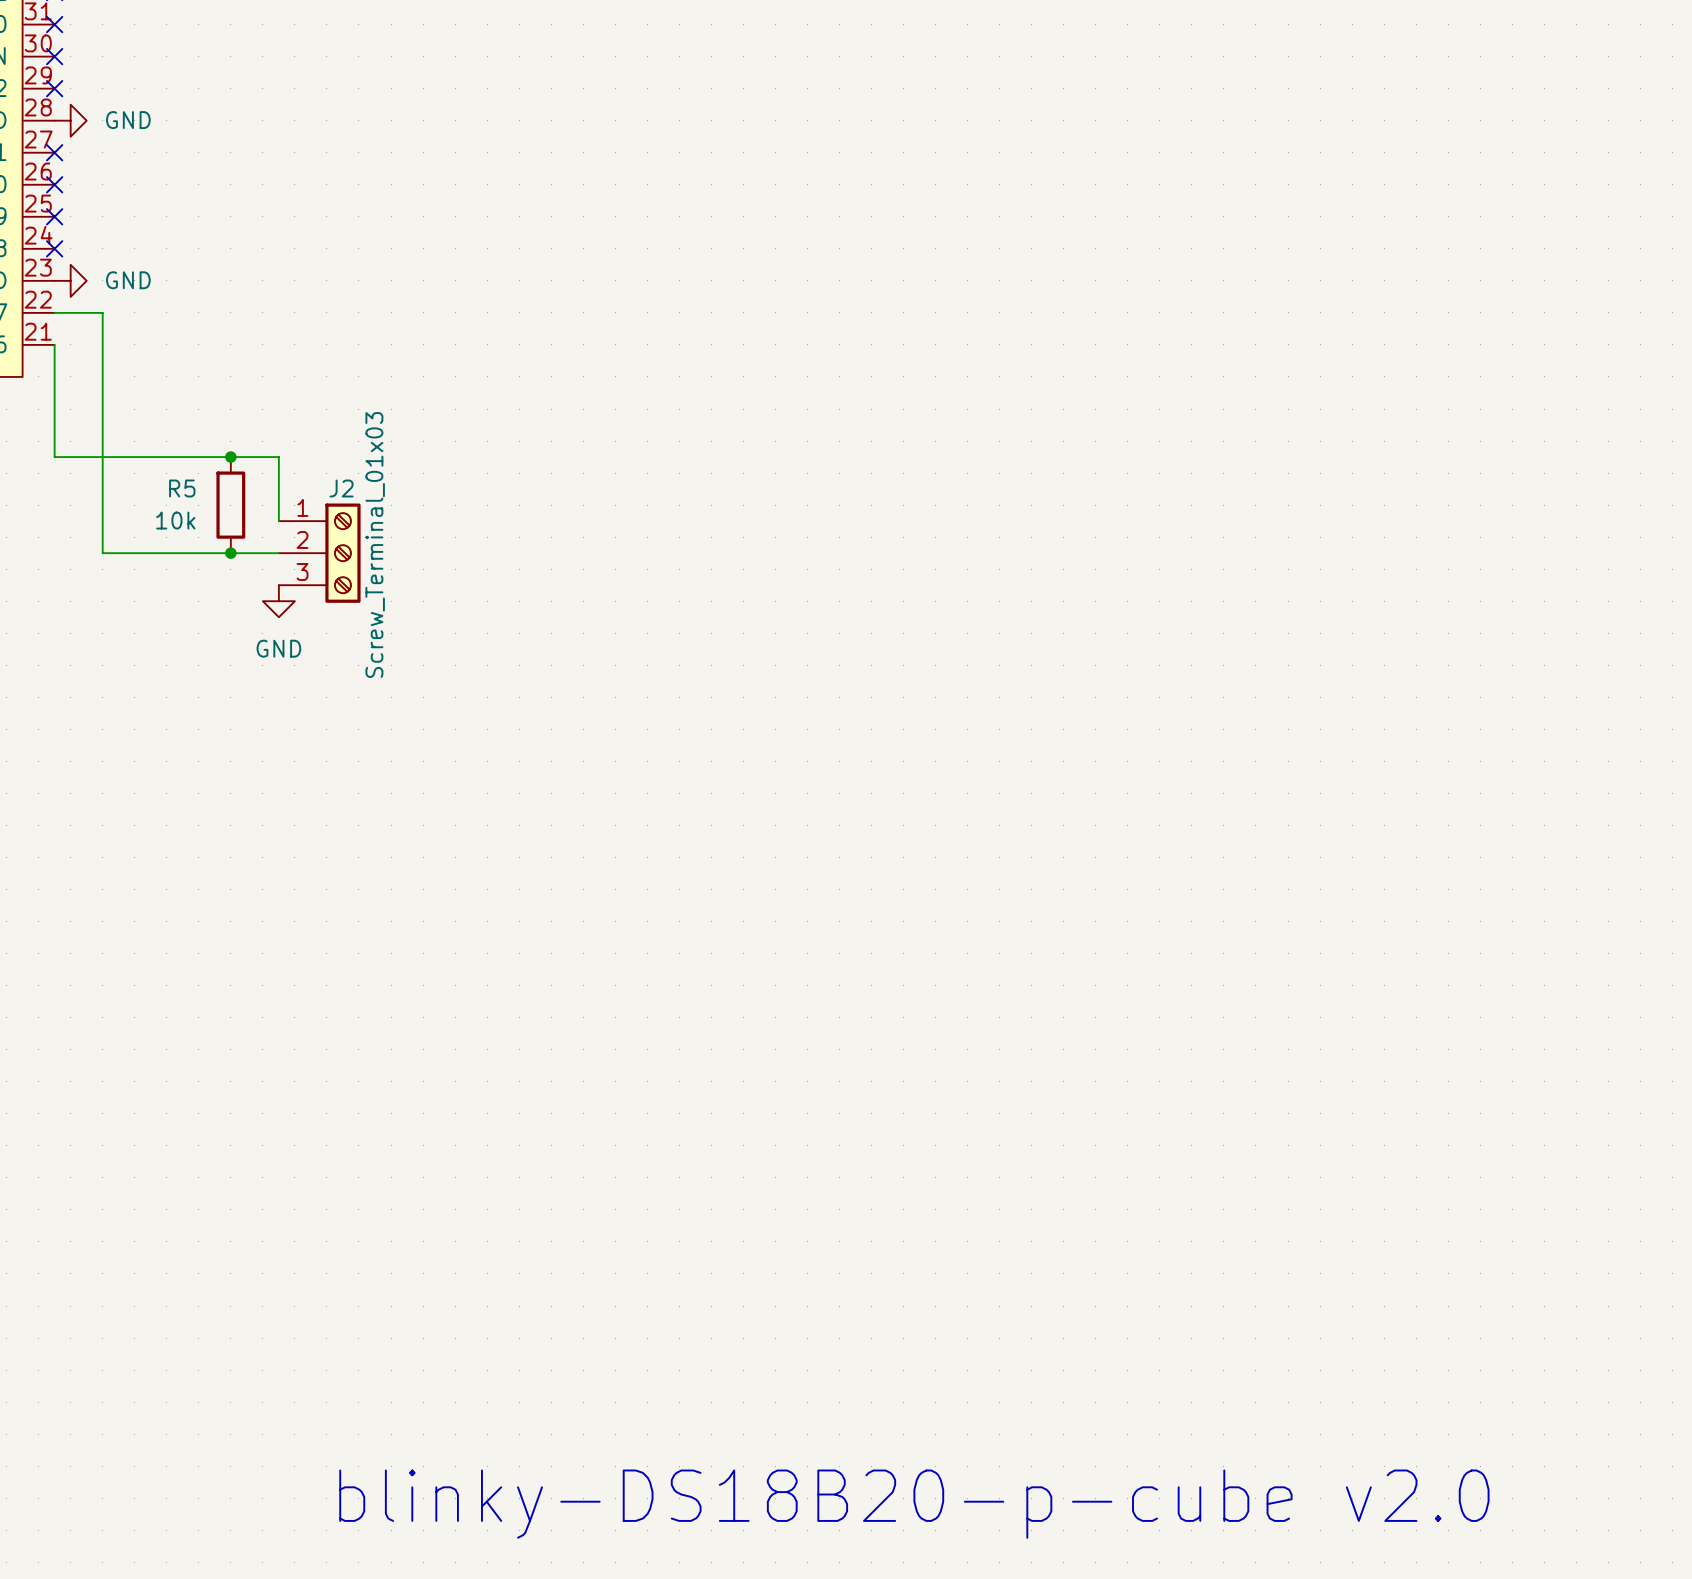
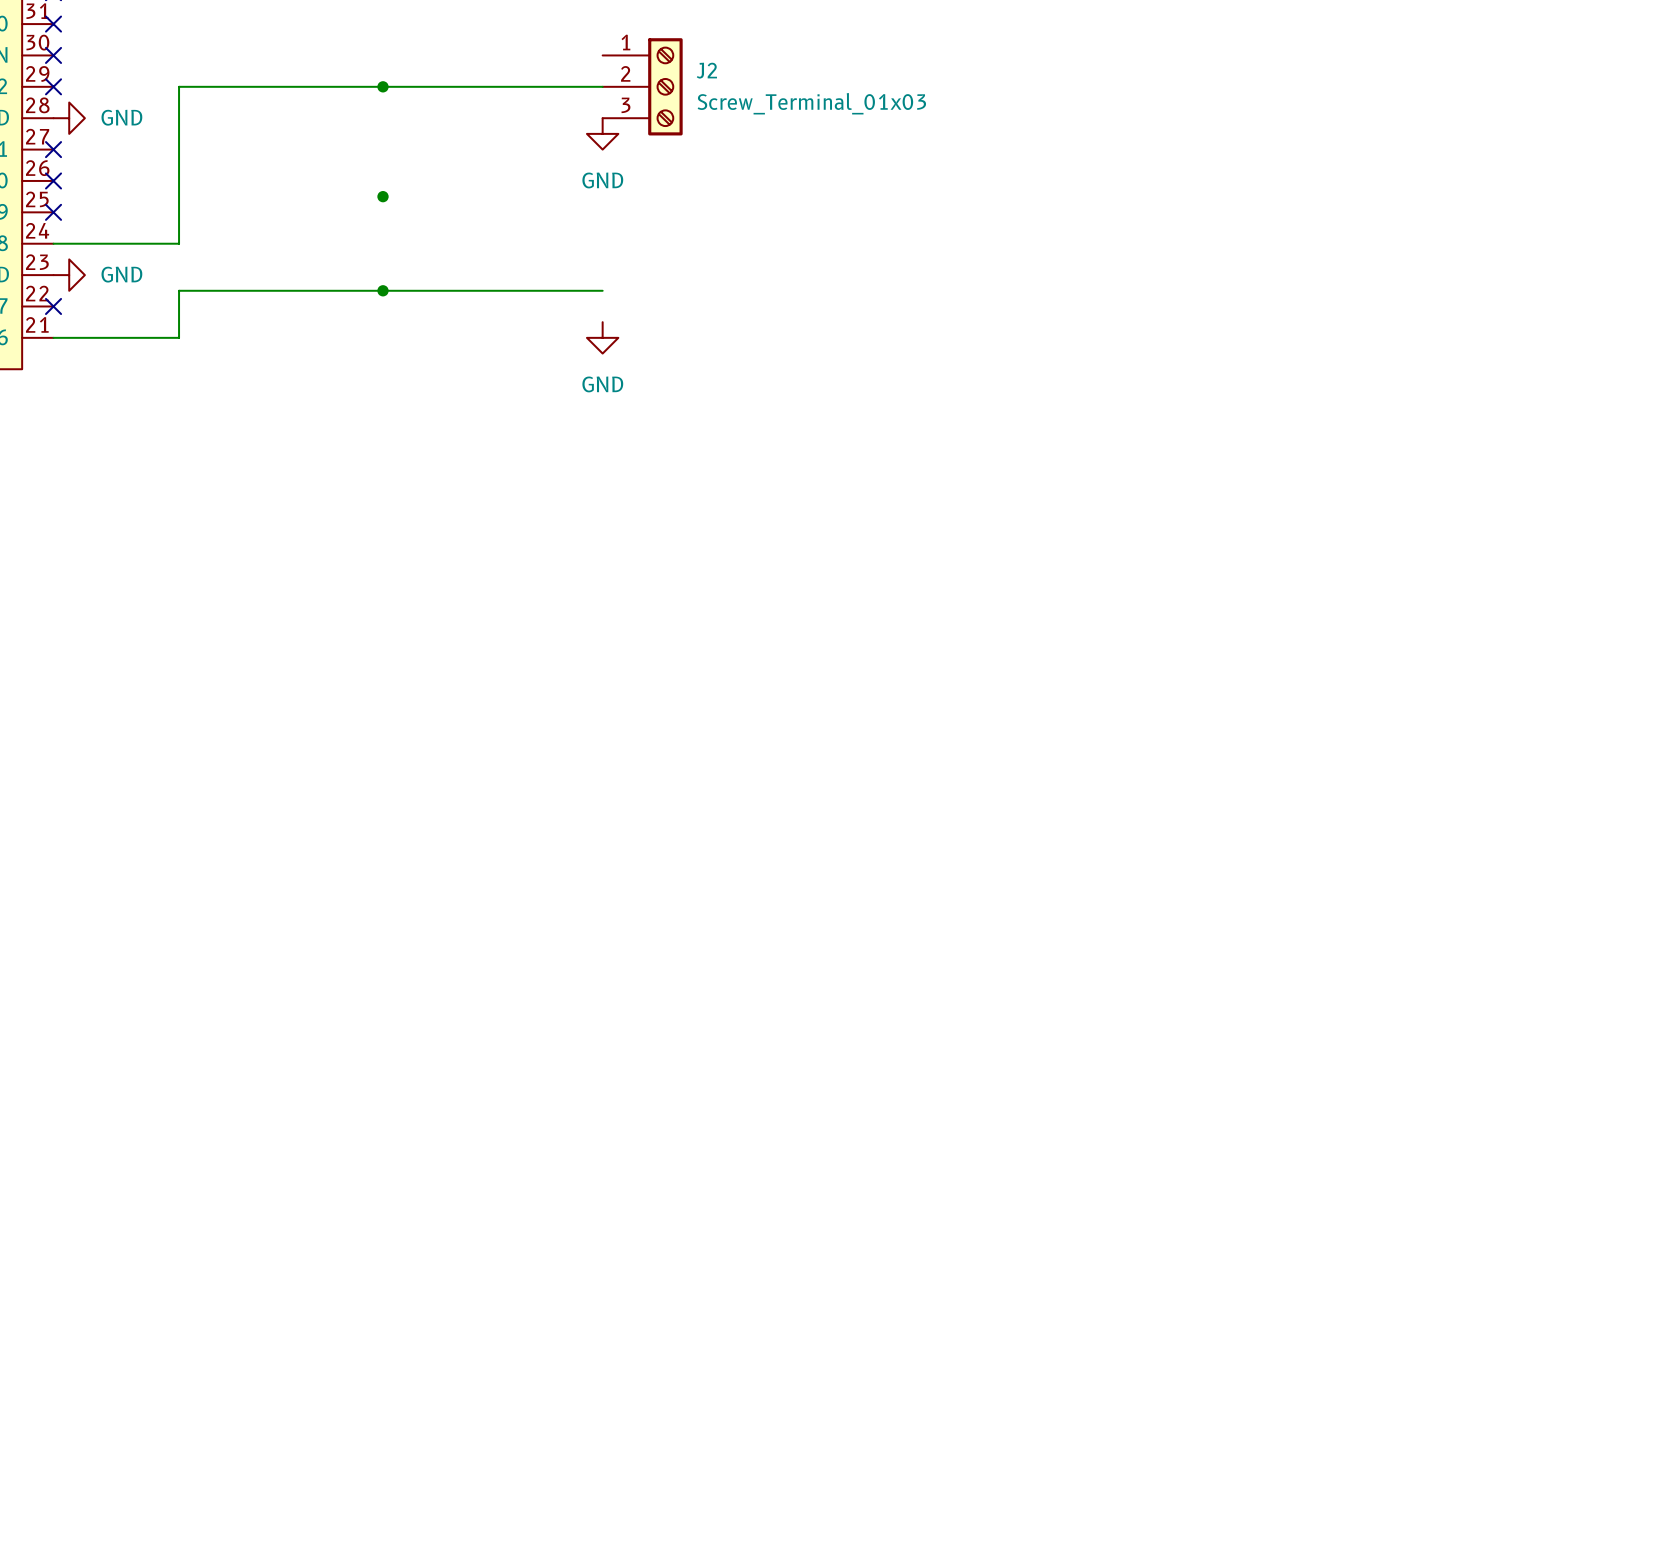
junction: none -> (383, 86)
wire: none -> (602, 86) (179, 86) (179, 243) (53, 243)
power symbol: none -> GND (602, 133)
junction: none -> (383, 196)
no-connect mark position: (54, 248) -> (53, 306)
junction: none -> (383, 290)
wire: (54, 312) (102, 312) (102, 553) (278, 553) -> none
wire: (54, 344) (54, 457) (278, 457) (278, 521) -> (53, 337) (179, 337) (179, 290) (602, 290)
power symbol: none -> GND (602, 337)
junction: (230, 457) -> none
J2 name position: J2 (341, 488) -> J2 (706, 70)
R5: 10k (230, 505) -> none
J2 value rotation: 0° (375, 545) -> 90° clockwise (811, 103)
junction: (230, 553) -> none
J2 position: (319, 553) -> (642, 86)
power symbol: GND (278, 601) -> none
text: blinky-DS18B20-p-cube v2.0 (914, 1504) -> none

